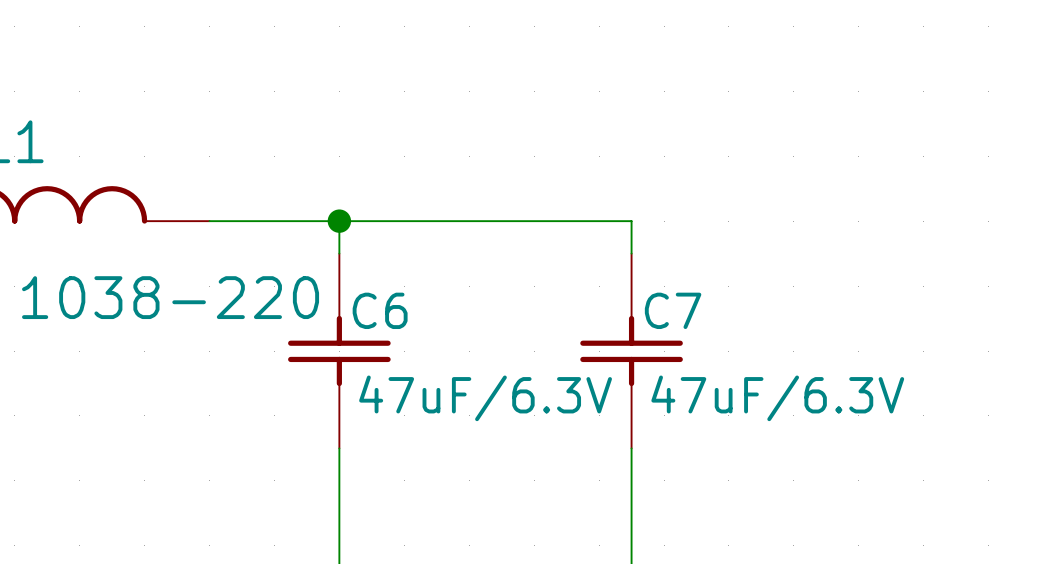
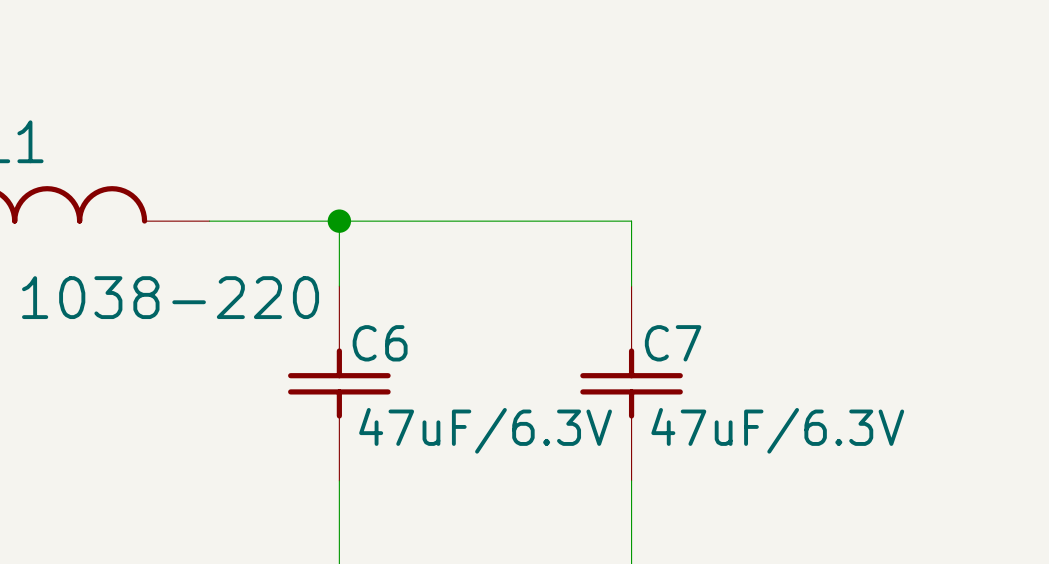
C6 position: (339, 351) -> (339, 383)
C7 position: (631, 351) -> (631, 383)

